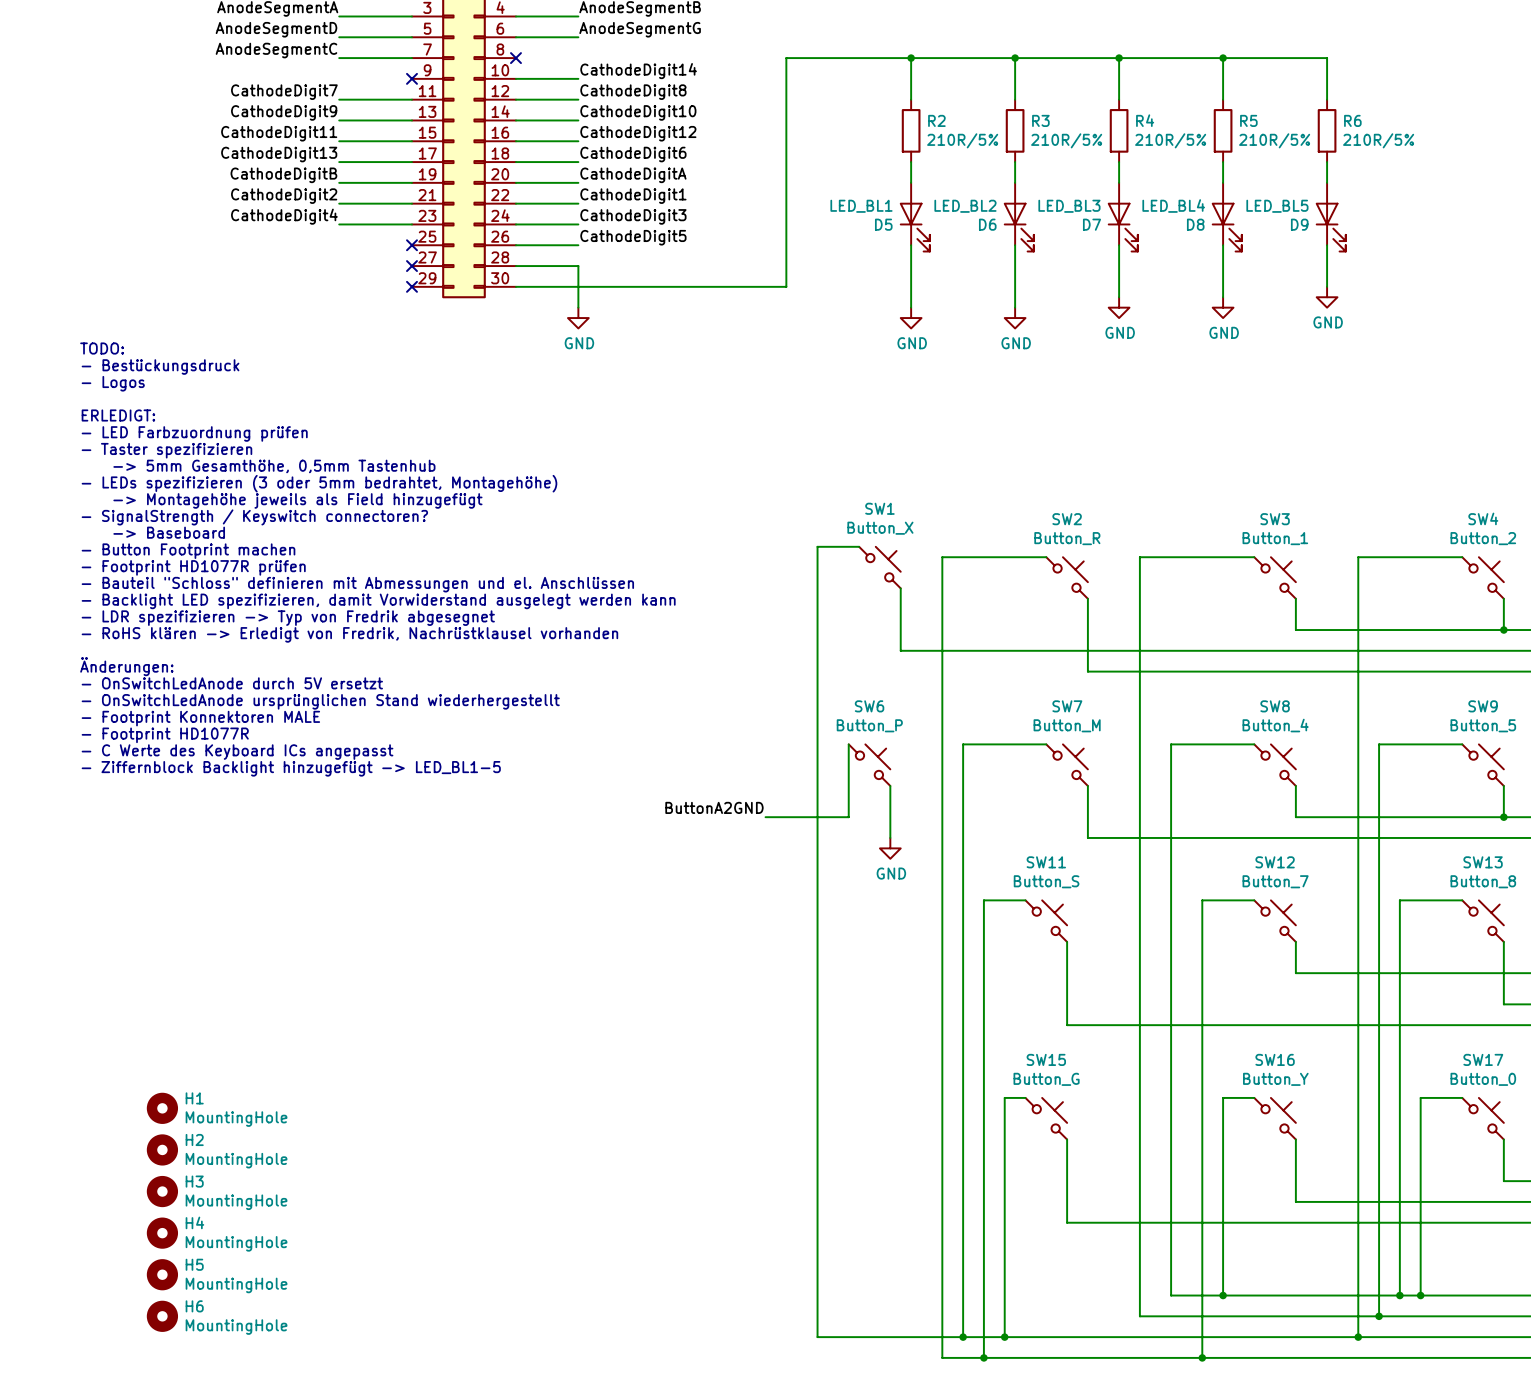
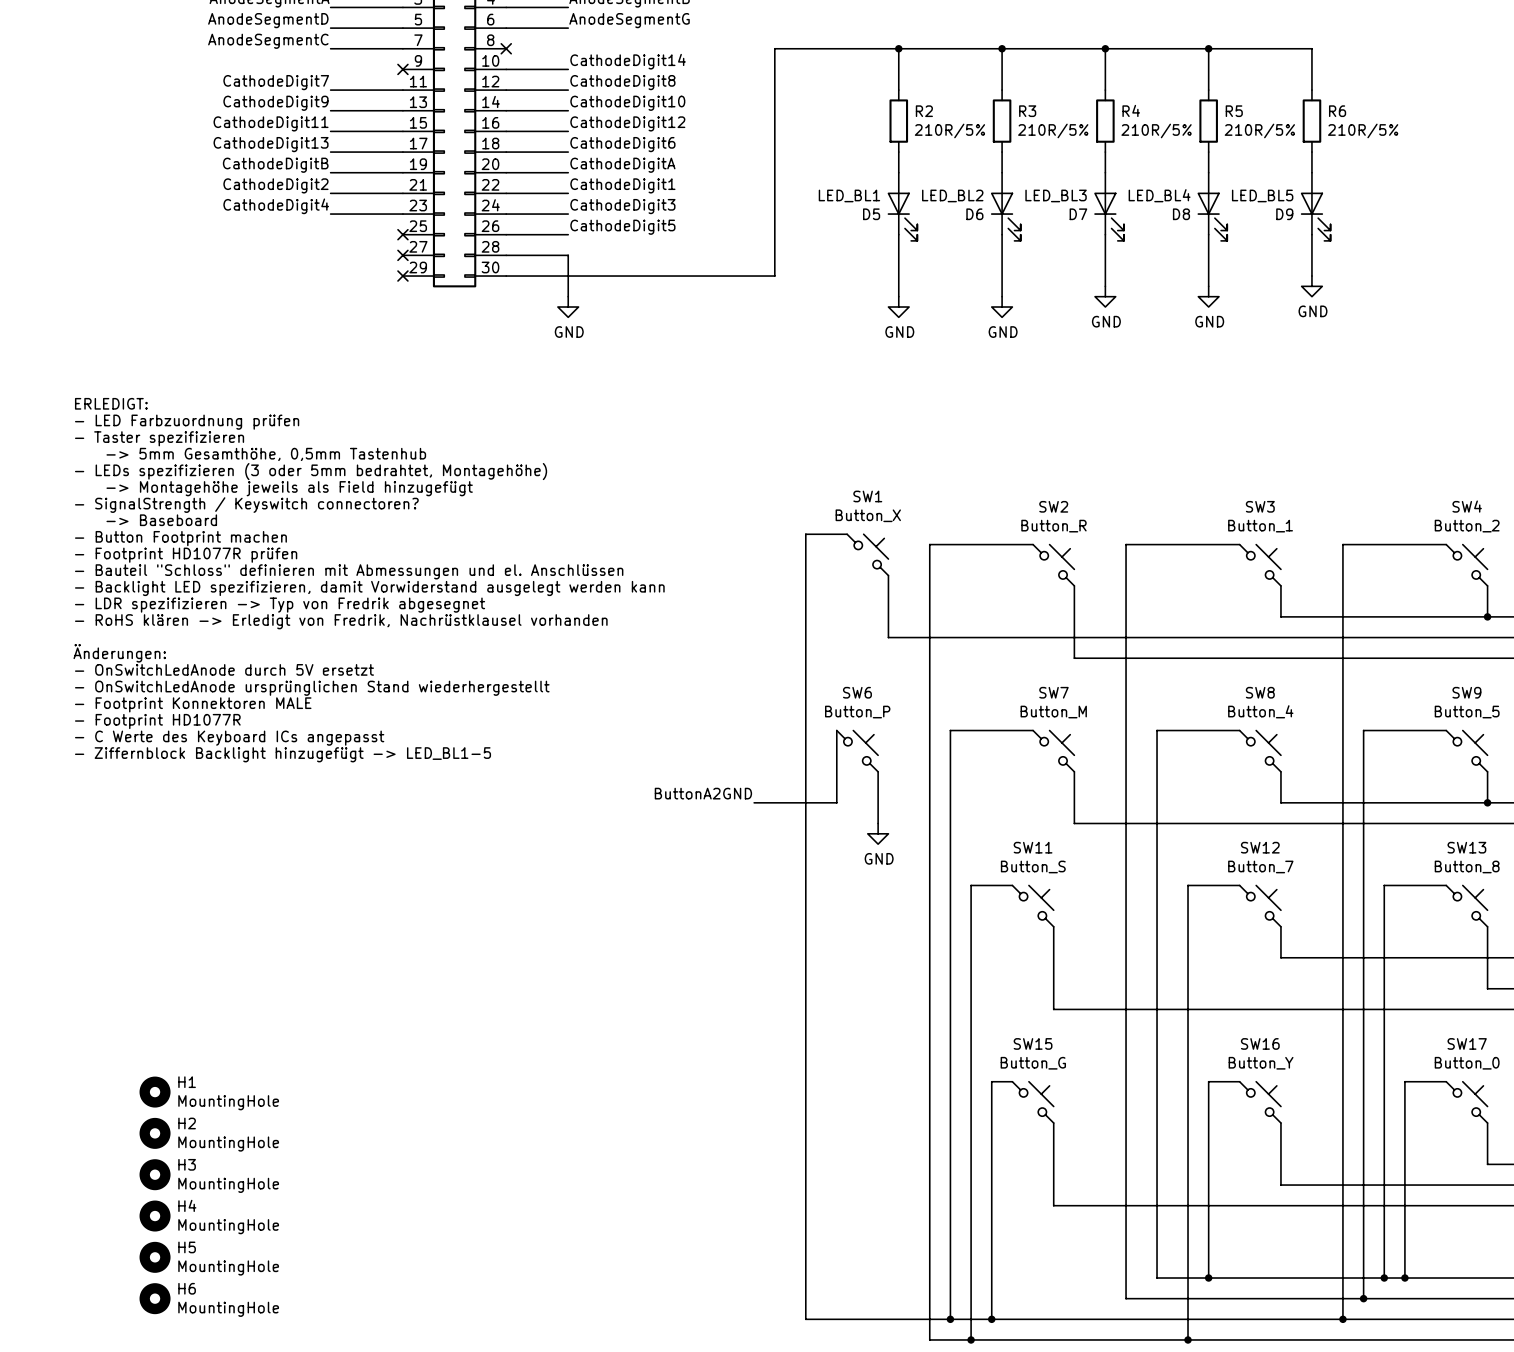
text: TODO: (102, 348) -> none
text: - Bestückungsdruck (160, 366) -> none
text: - Logos (113, 383) -> none

